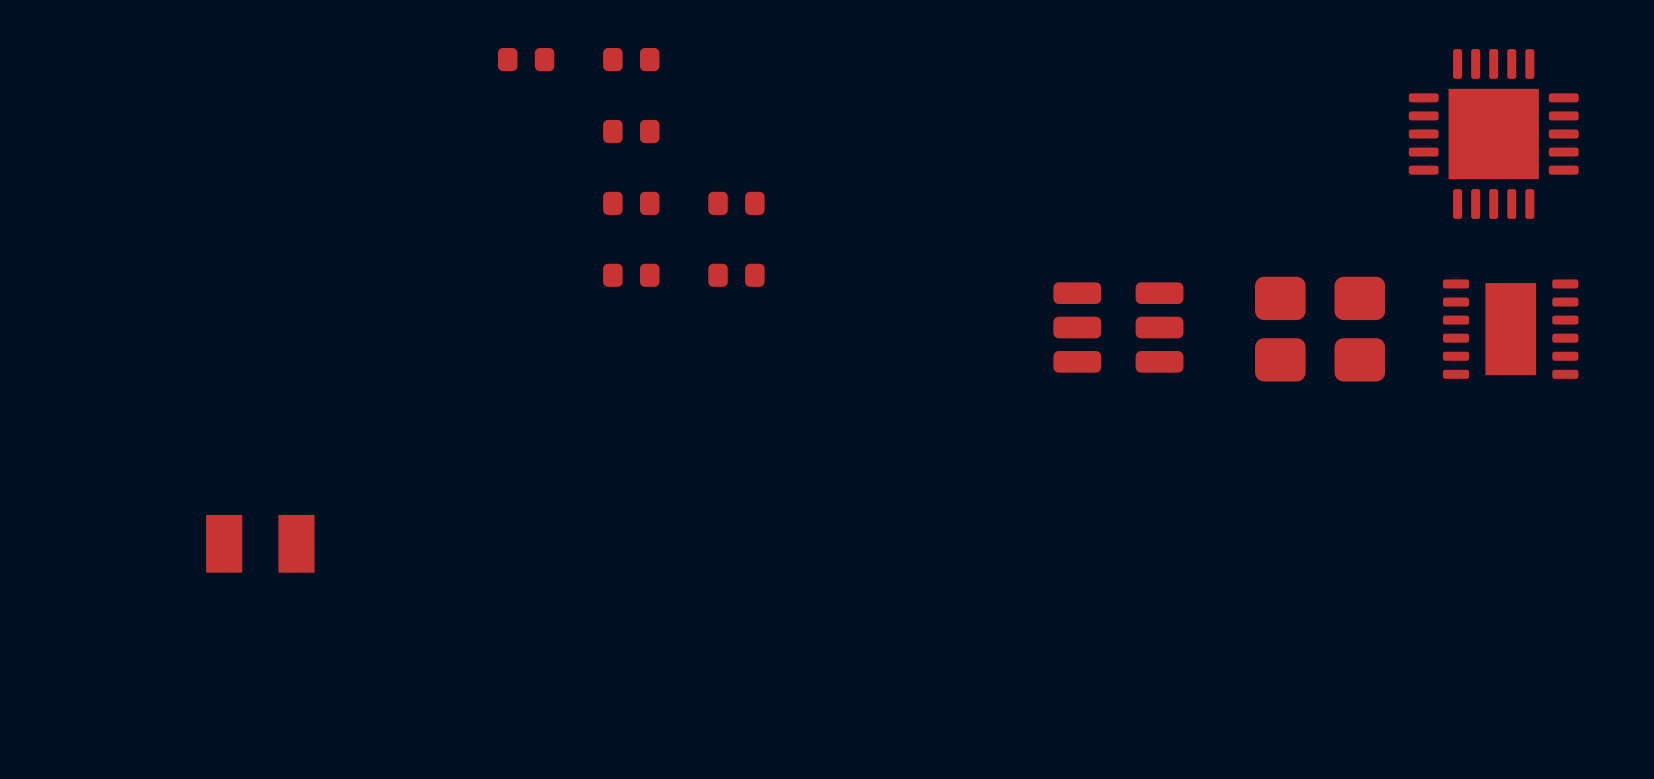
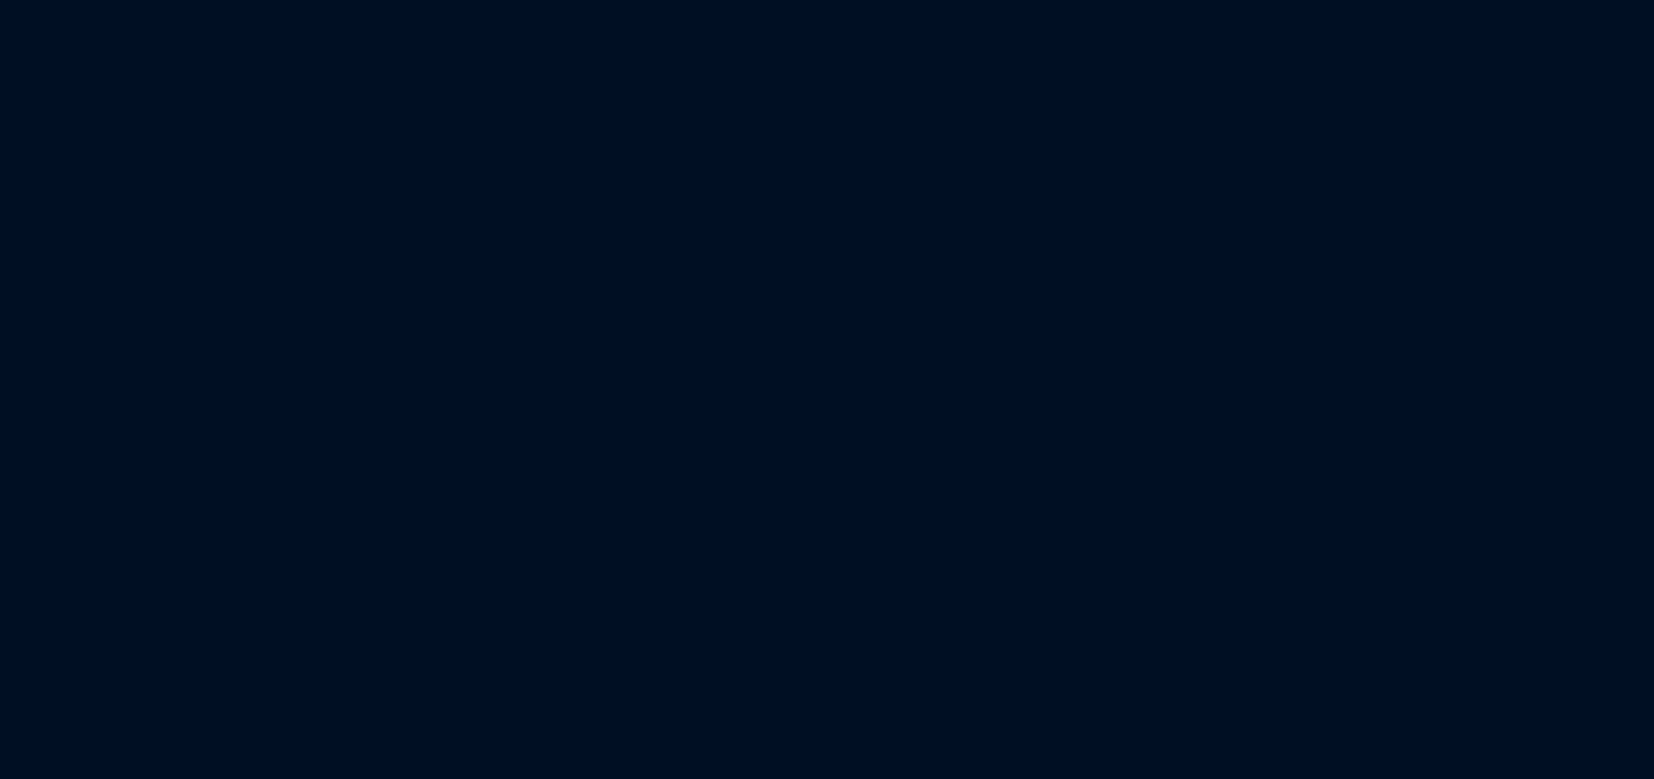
part: (526, 59) -> none
part: (631, 59) -> none
part: (631, 131) -> none
part: (1493, 133) -> none
part: (631, 203) -> none
part: (736, 203) -> none
part: (631, 275) -> none
part: (736, 275) -> none
part: (1118, 327) -> none
part: (1320, 329) -> none
part: (1510, 329) -> none
part: (260, 543) -> none

